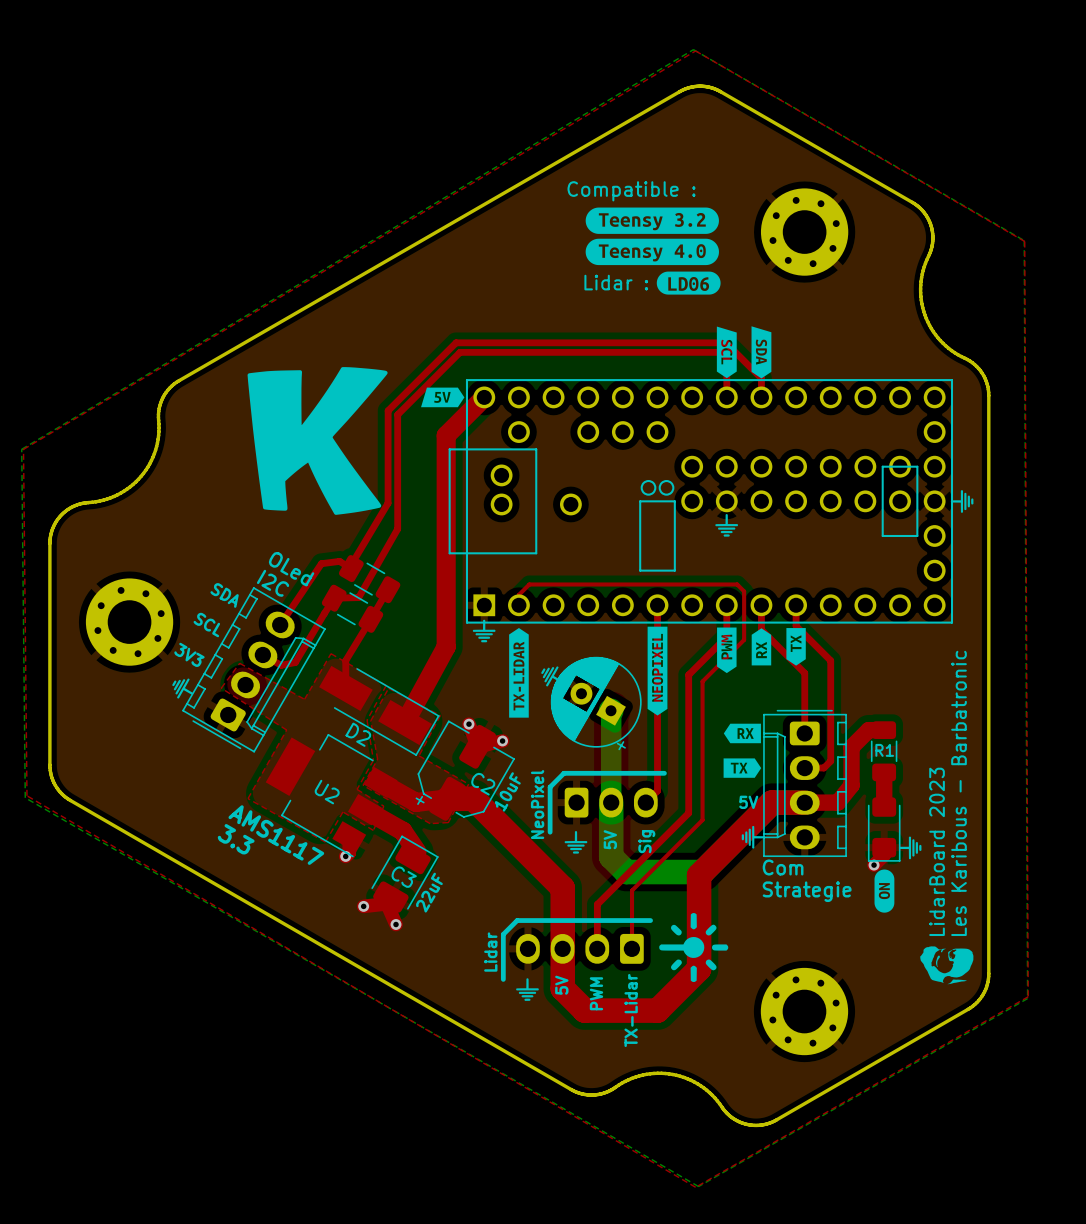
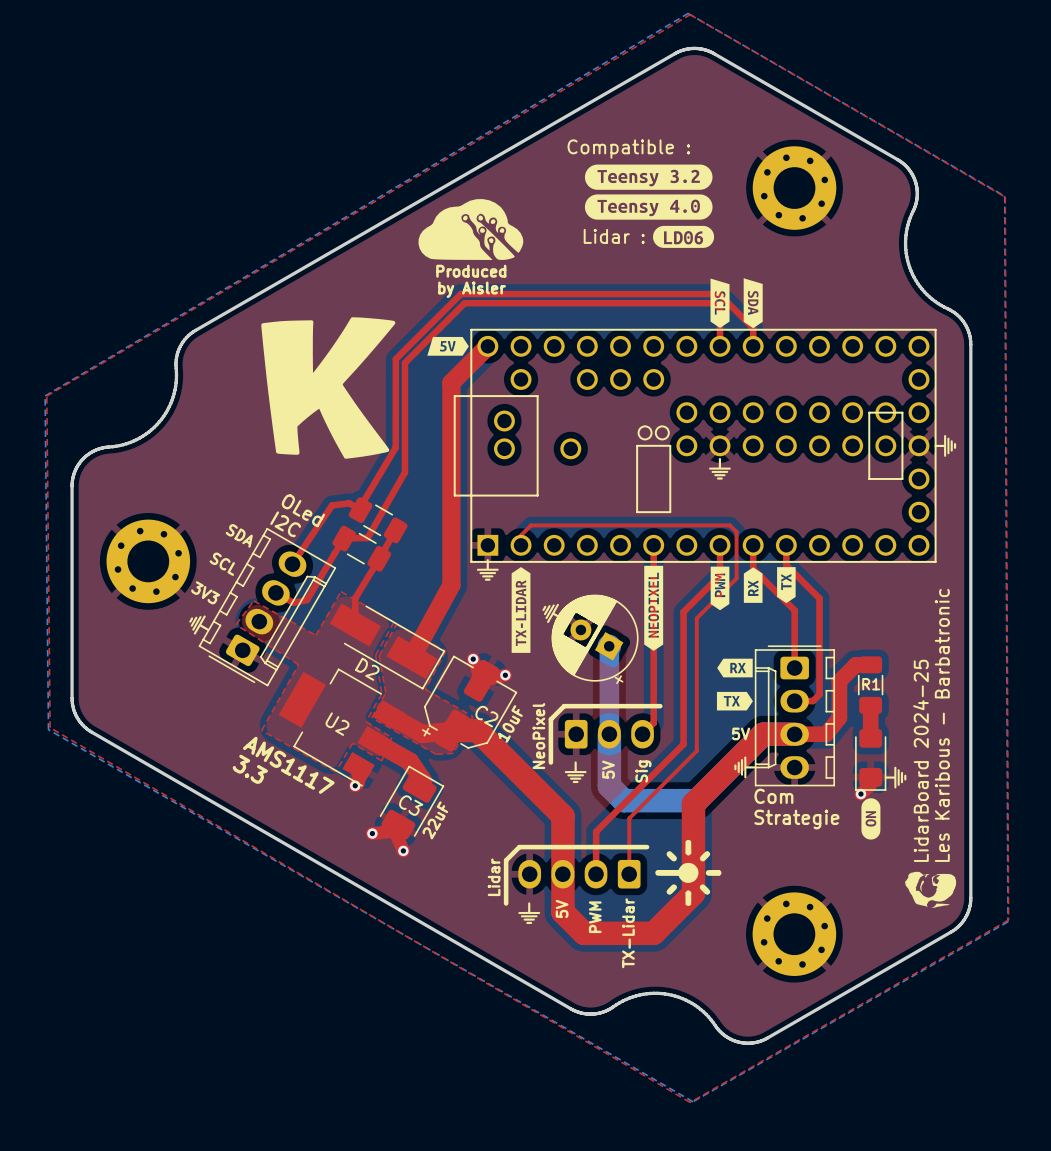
drawing: none -> [418, 199, 524, 260]
text: none -> Produced (471, 271)
text: none -> by Aisler (472, 289)
text: LidarBoard 2023 (937, 851) -> LidarBoard 2024-25 (920, 760)

